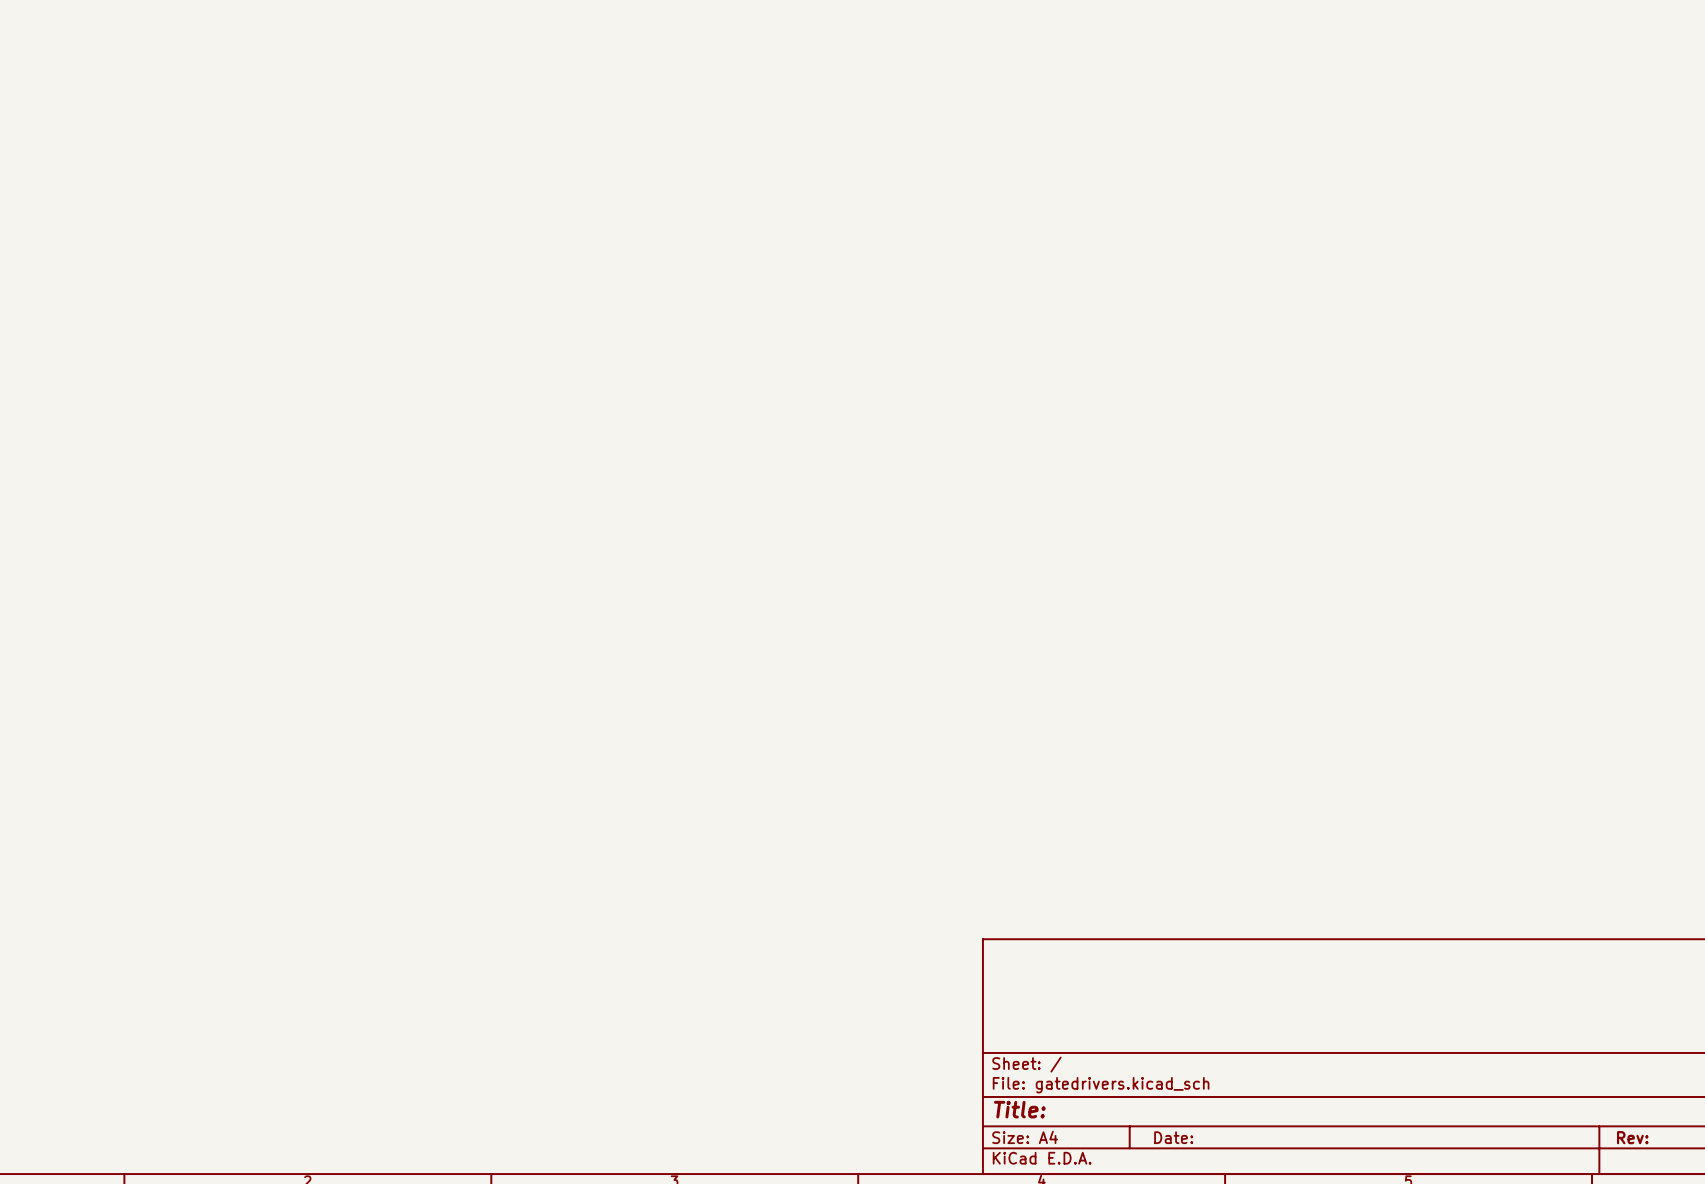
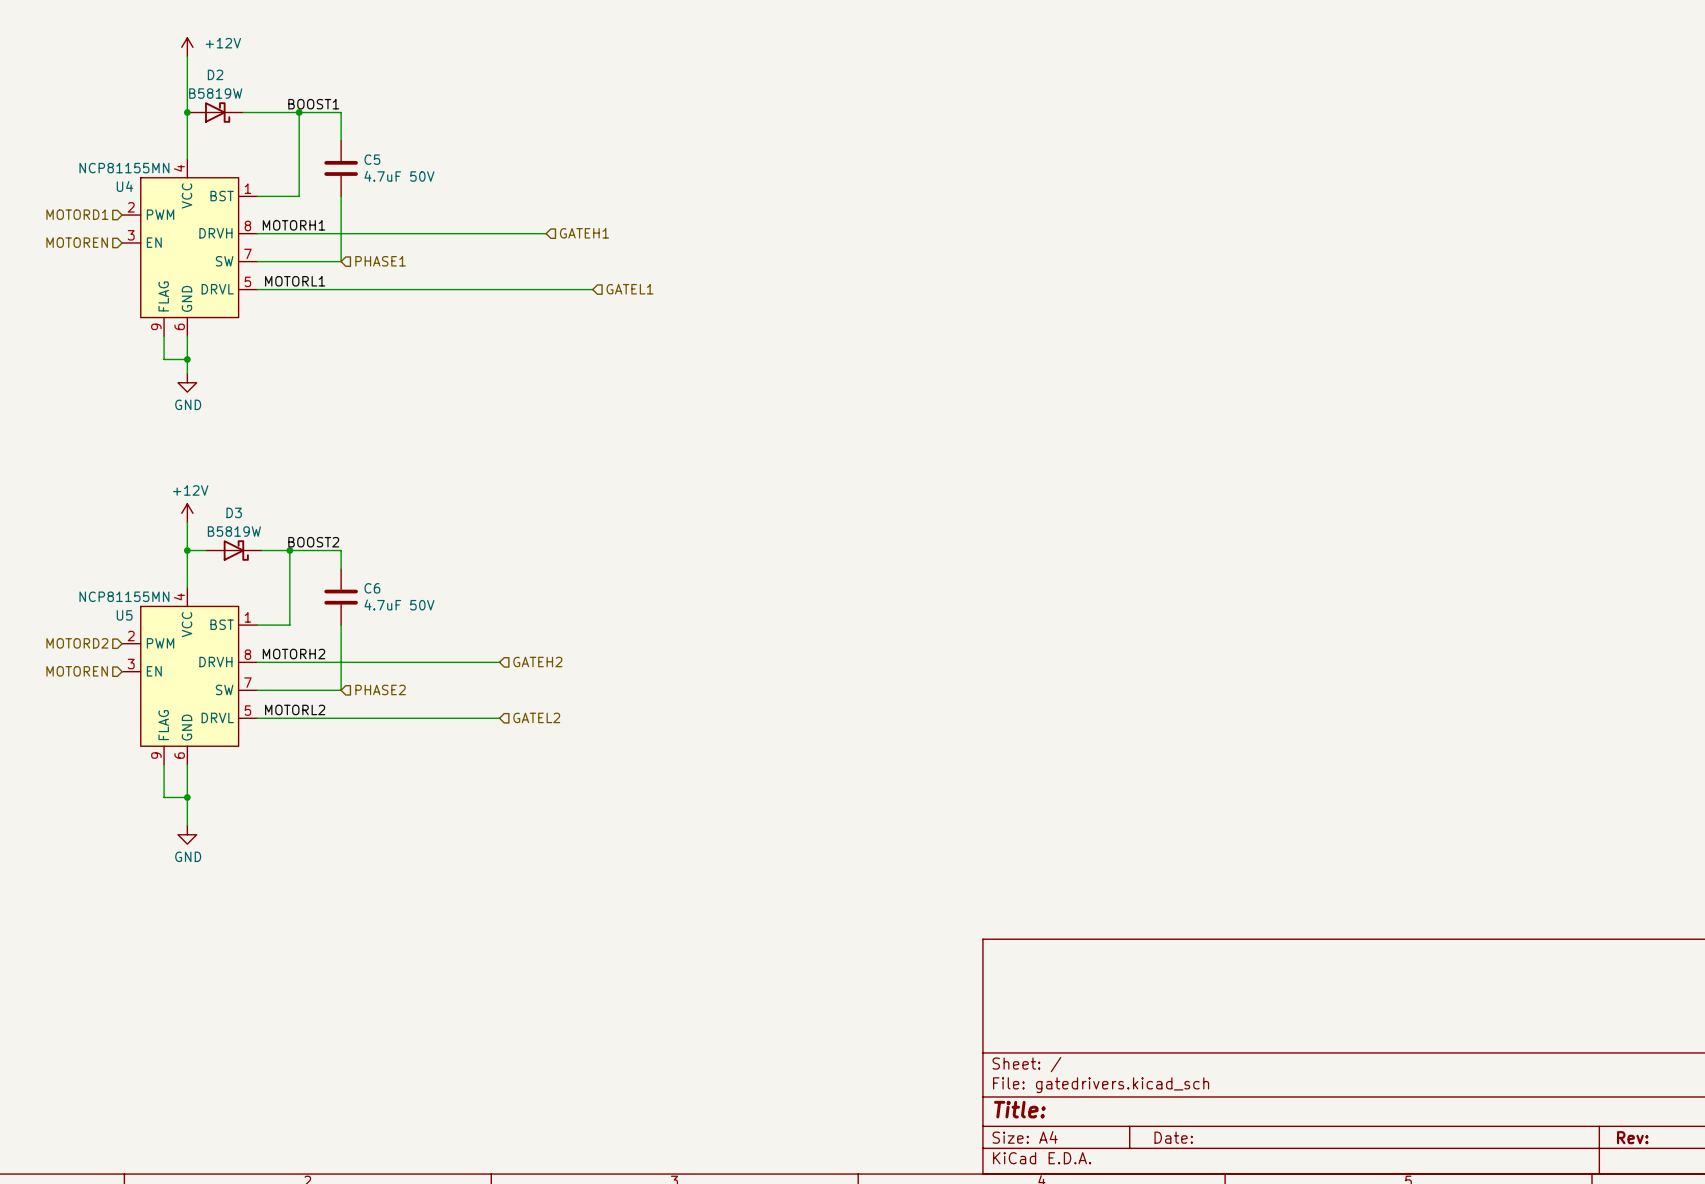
power symbol: none -> +12V (187, 47)
wire: none -> (187, 56) (187, 159)
label: none -> BOOST1 (313, 104)
junction: none -> (187, 112)
D2: none -> B5819W (215, 112)
wire: none -> (243, 112) (341, 112) (341, 140)
wire: none -> (299, 112) (299, 196) (257, 196)
junction: none -> (299, 112)
C5: none -> 4.7uF 50V (341, 168)
wire: none -> (341, 196) (341, 261) (257, 261)
hierarchical label: none -> MOTORD1 (77, 214)
label: none -> MOTORH1 (294, 225)
wire: none -> (257, 233) (546, 233)
hierarchical label: none -> GATEH1 (584, 233)
hierarchical label: none -> MOTOREN (77, 242)
U4: none -> NCP81155MN (189, 247)
hierarchical label: none -> PHASE1 (380, 261)
label: none -> MOTORL1 (295, 281)
wire: none -> (257, 289) (592, 289)
hierarchical label: none -> GATEL1 (629, 289)
wire: none -> (164, 336) (164, 359) (187, 359)
wire: none -> (187, 336) (187, 373)
junction: none -> (187, 359)
power symbol: none -> GND (187, 382)
power symbol: none -> +12V (187, 513)
wire: none -> (187, 522) (187, 587)
label: none -> BOOST2 (313, 542)
wire: none -> (187, 550) (205, 550)
junction: none -> (187, 550)
D3: none -> B5819W (233, 550)
wire: none -> (261, 550) (341, 550) (341, 569)
wire: none -> (289, 550) (289, 625) (257, 625)
junction: none -> (289, 550)
C6: none -> 4.7uF 50V (341, 597)
wire: none -> (341, 625) (341, 690) (257, 690)
hierarchical label: none -> MOTORD2 (77, 643)
label: none -> MOTORH2 (294, 654)
wire: none -> (257, 662) (499, 662)
hierarchical label: none -> GATEH2 (537, 662)
hierarchical label: none -> MOTOREN (77, 671)
U5: none -> NCP81155MN (189, 676)
hierarchical label: none -> PHASE2 (380, 689)
label: none -> MOTORL2 (295, 709)
hierarchical label: none -> GATEL2 (536, 717)
wire: none -> (257, 718) (499, 718)
wire: none -> (164, 764) (164, 797) (187, 797)
wire: none -> (187, 764) (187, 825)
junction: none -> (187, 797)
power symbol: none -> GND (187, 834)

